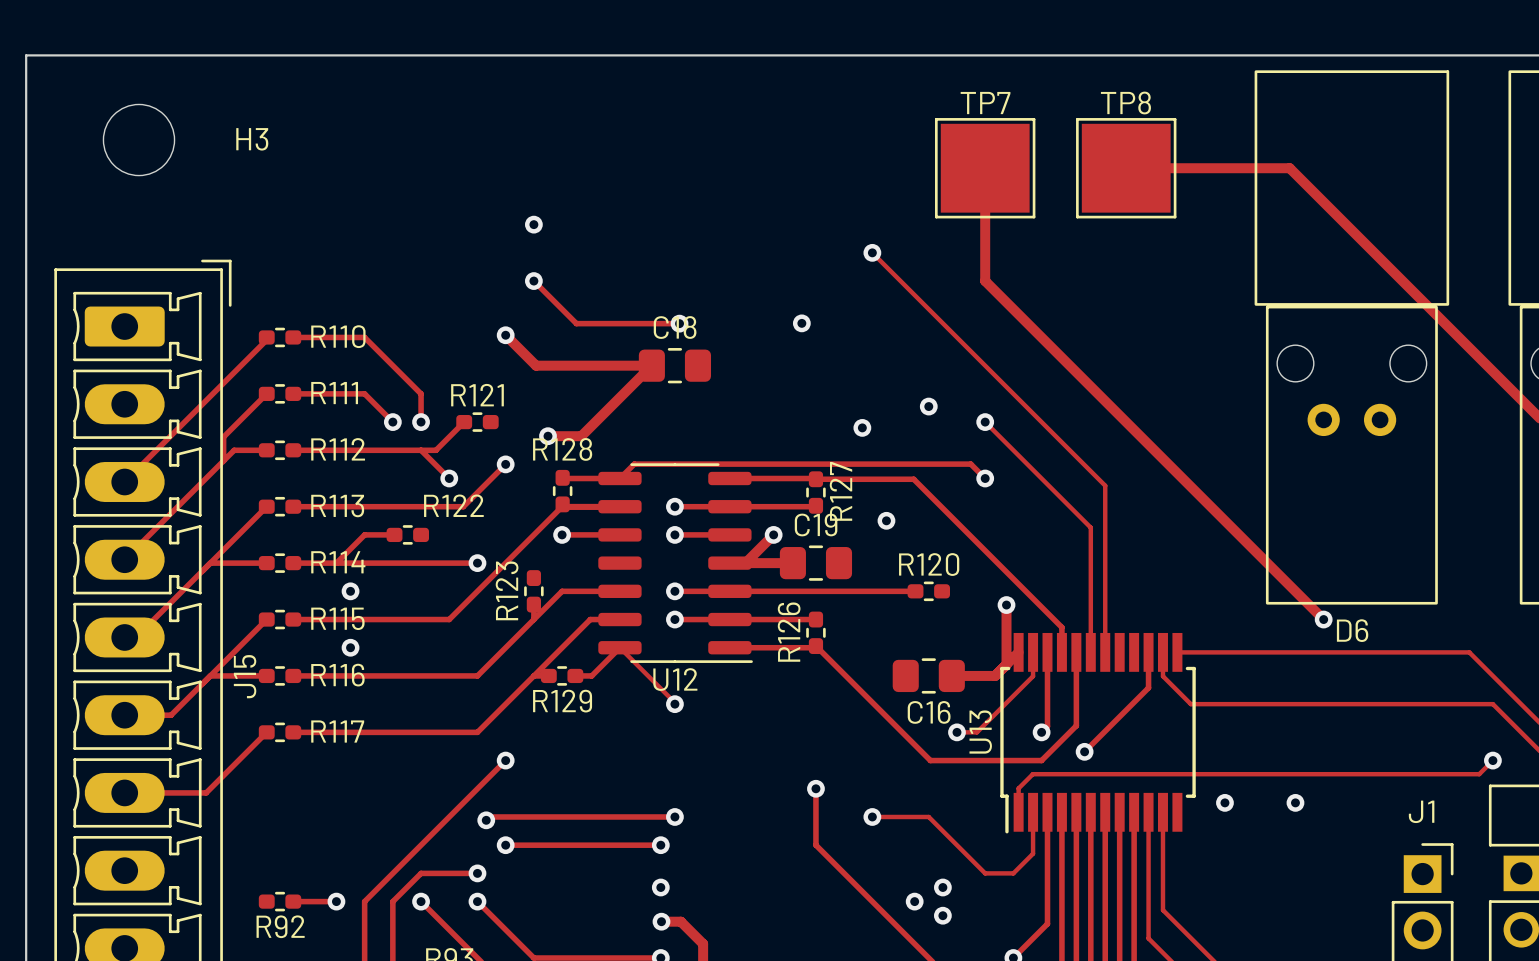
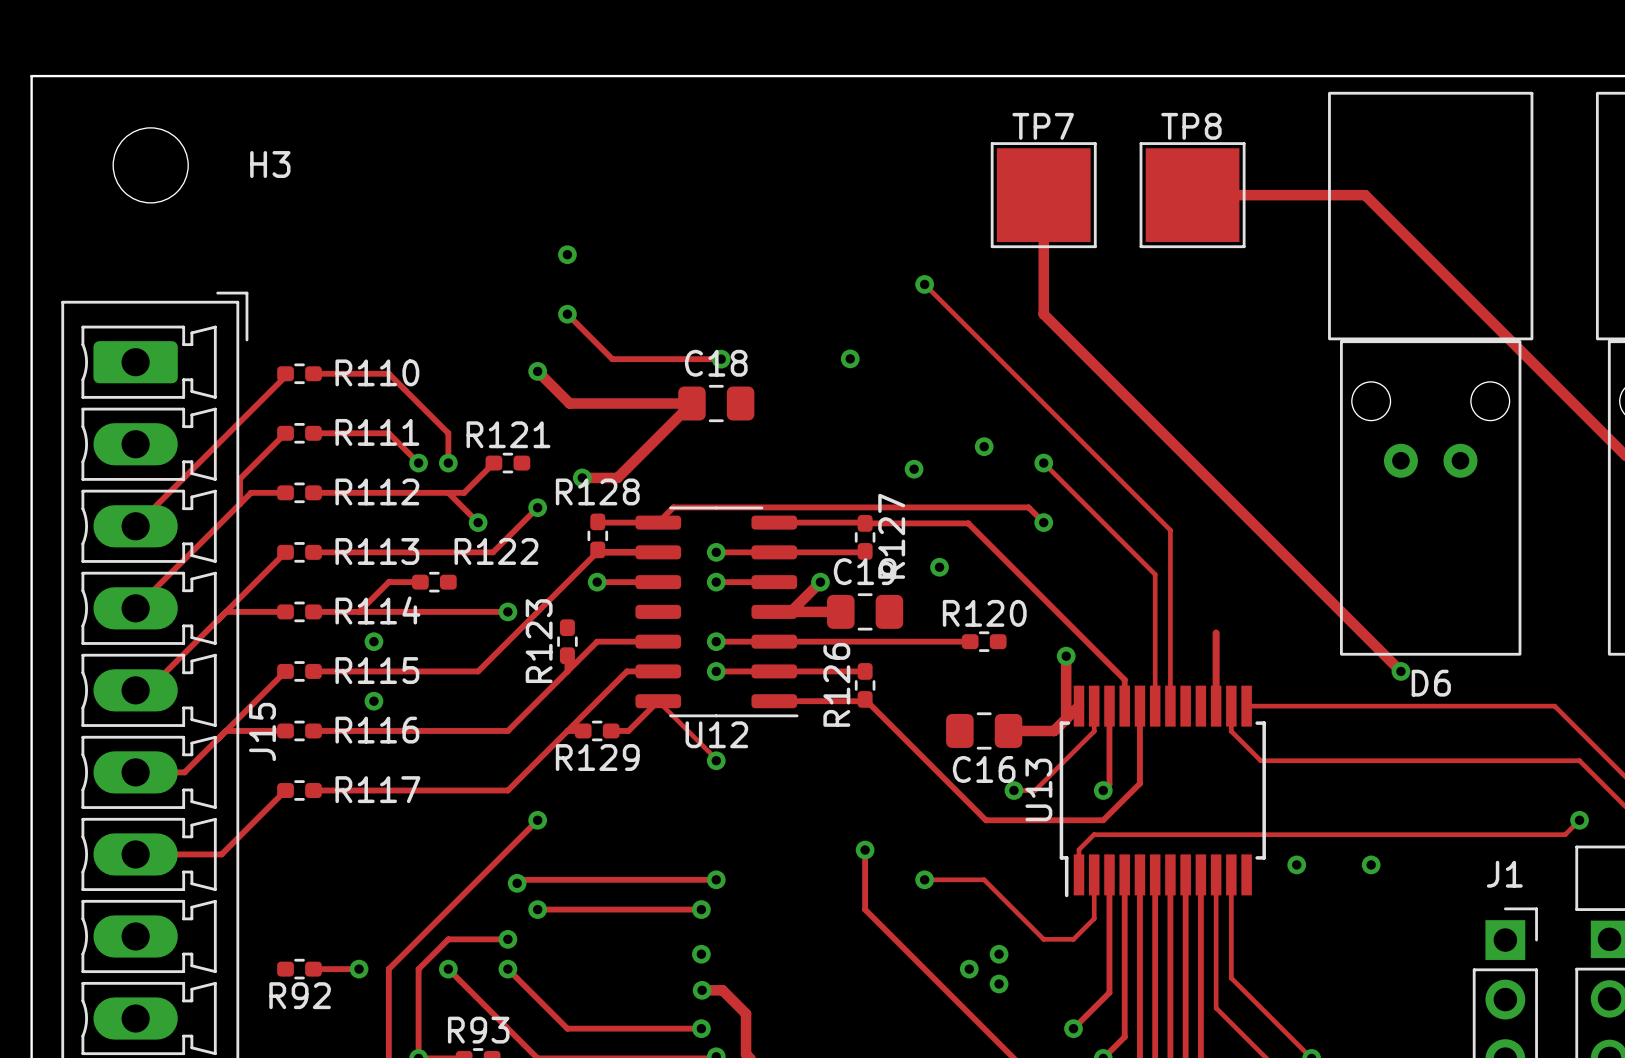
track: (1148, 652) (1148, 687) (1084, 751) -> (1216, 706) (1216, 633)
via: (1084, 751) -> none

